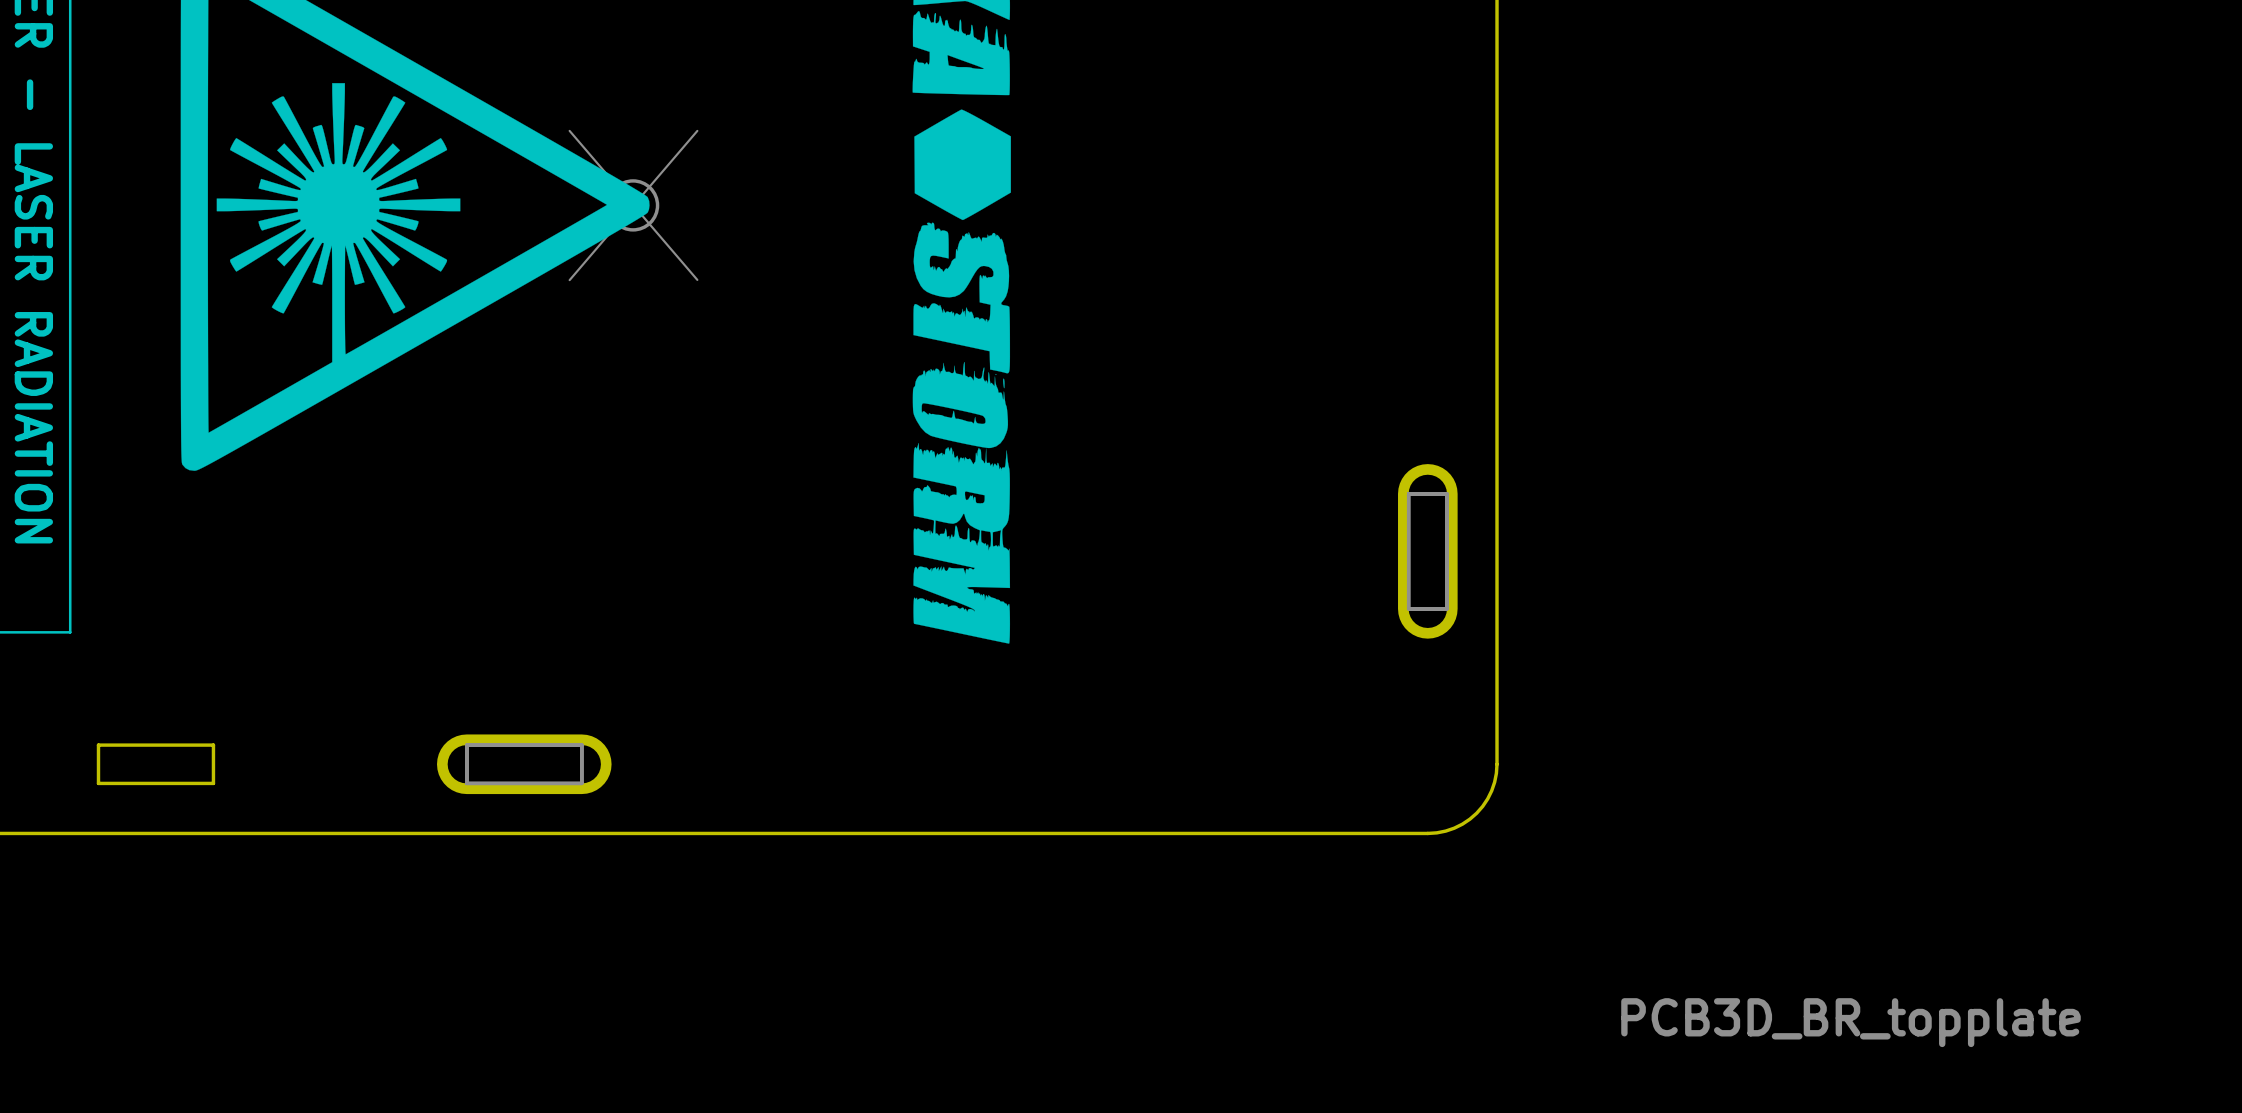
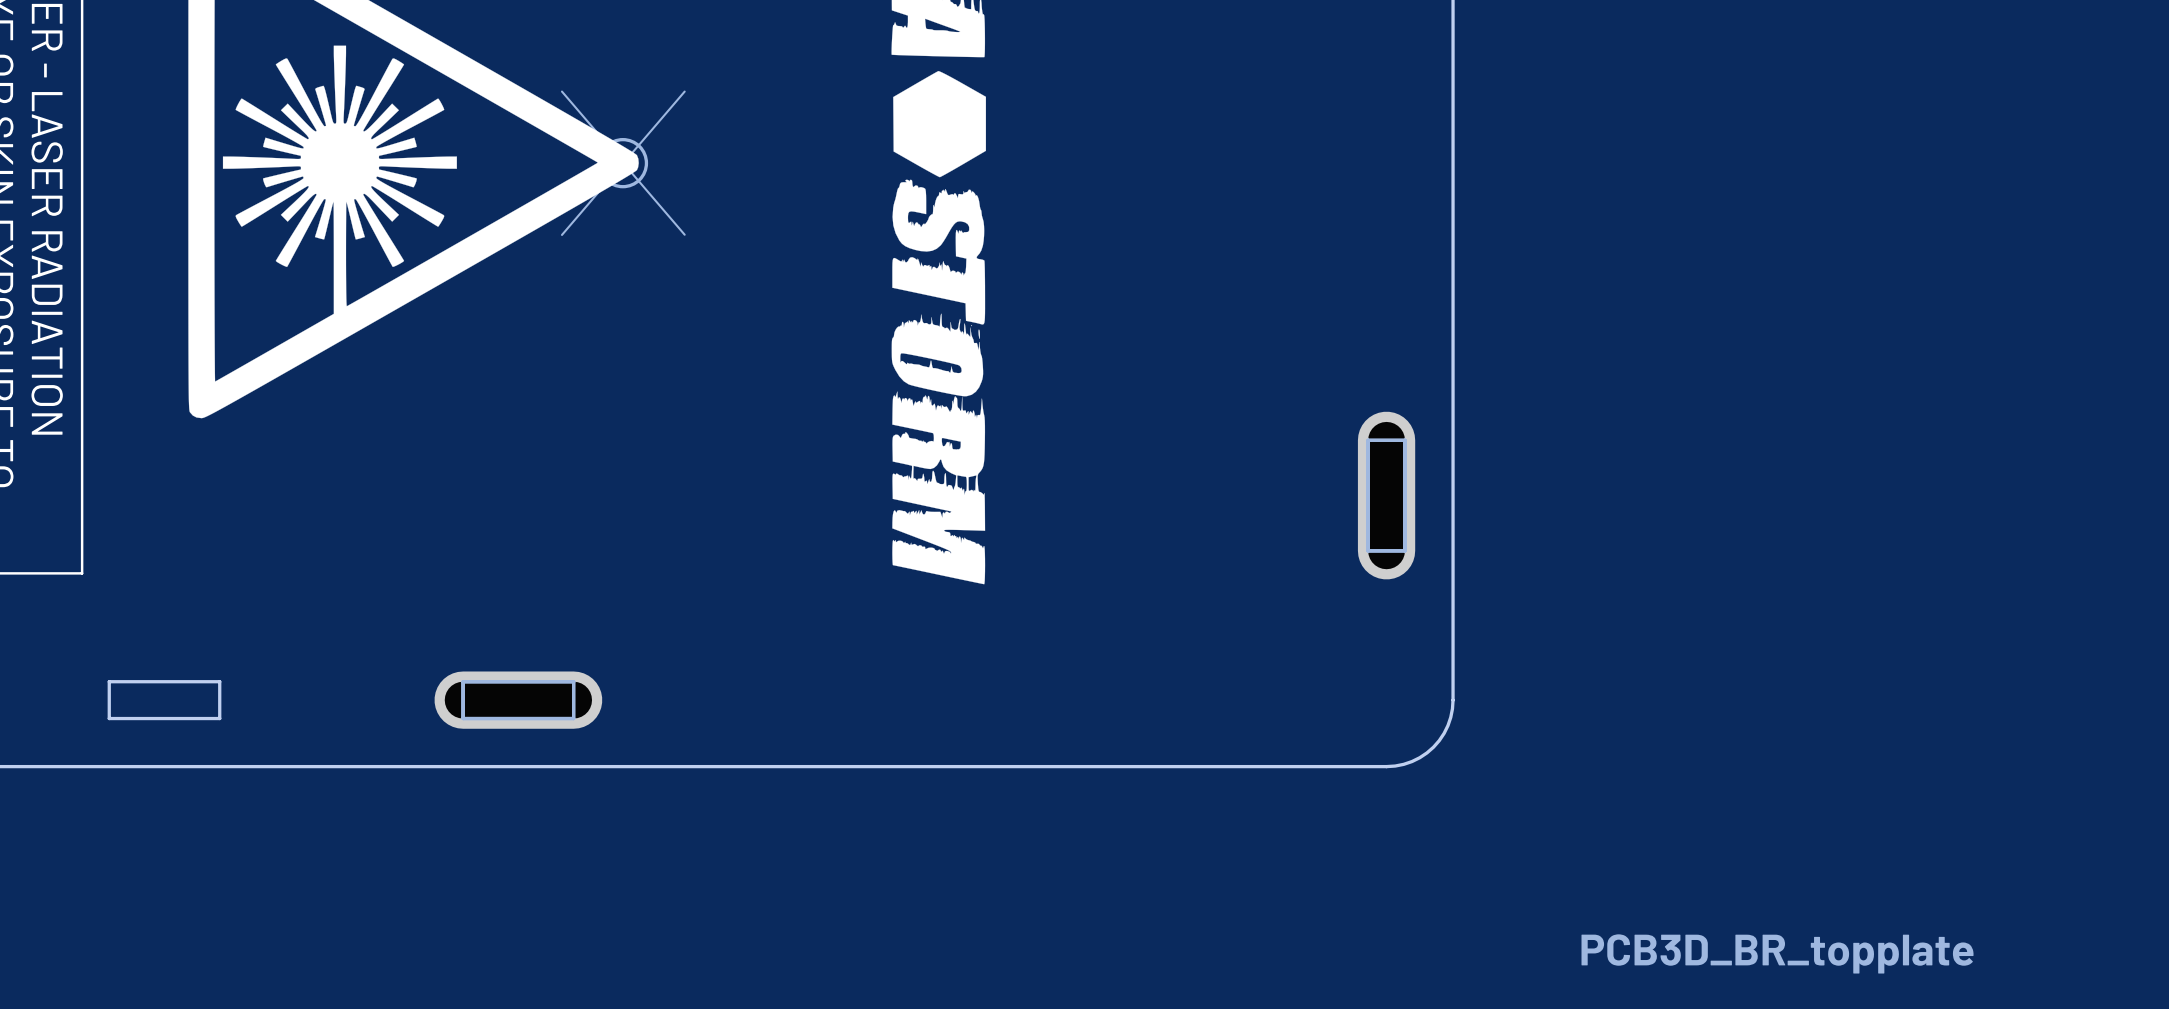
text position: PCB3D_BR_topplate (1850, 1022) -> PCB3D_BR_topplate (1777, 953)

